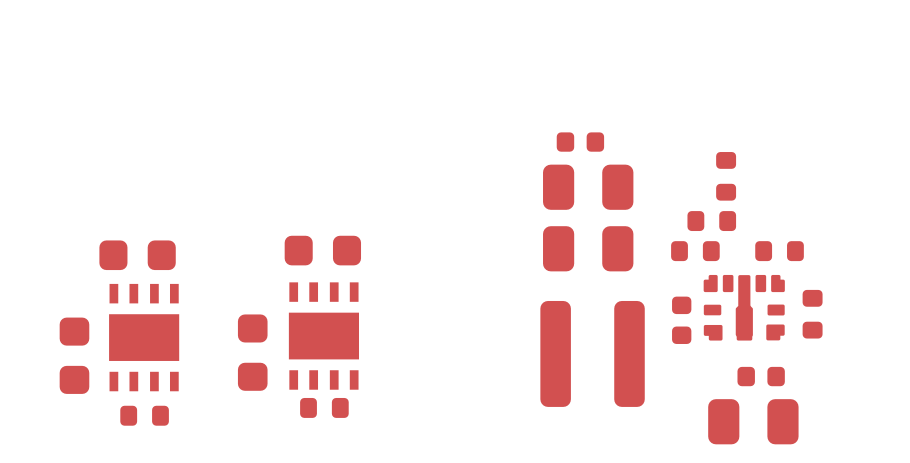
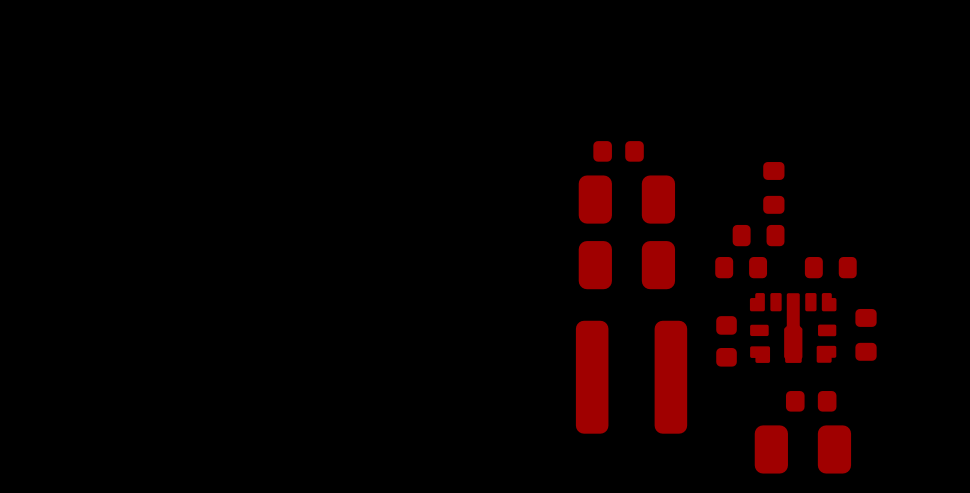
part: (322, 250) -> none
part: (137, 255) -> none
part: (323, 336) -> none
part: (144, 337) -> none
part: (252, 352) -> none
part: (74, 355) -> none
part: (324, 407) -> none
part: (144, 415) -> none

